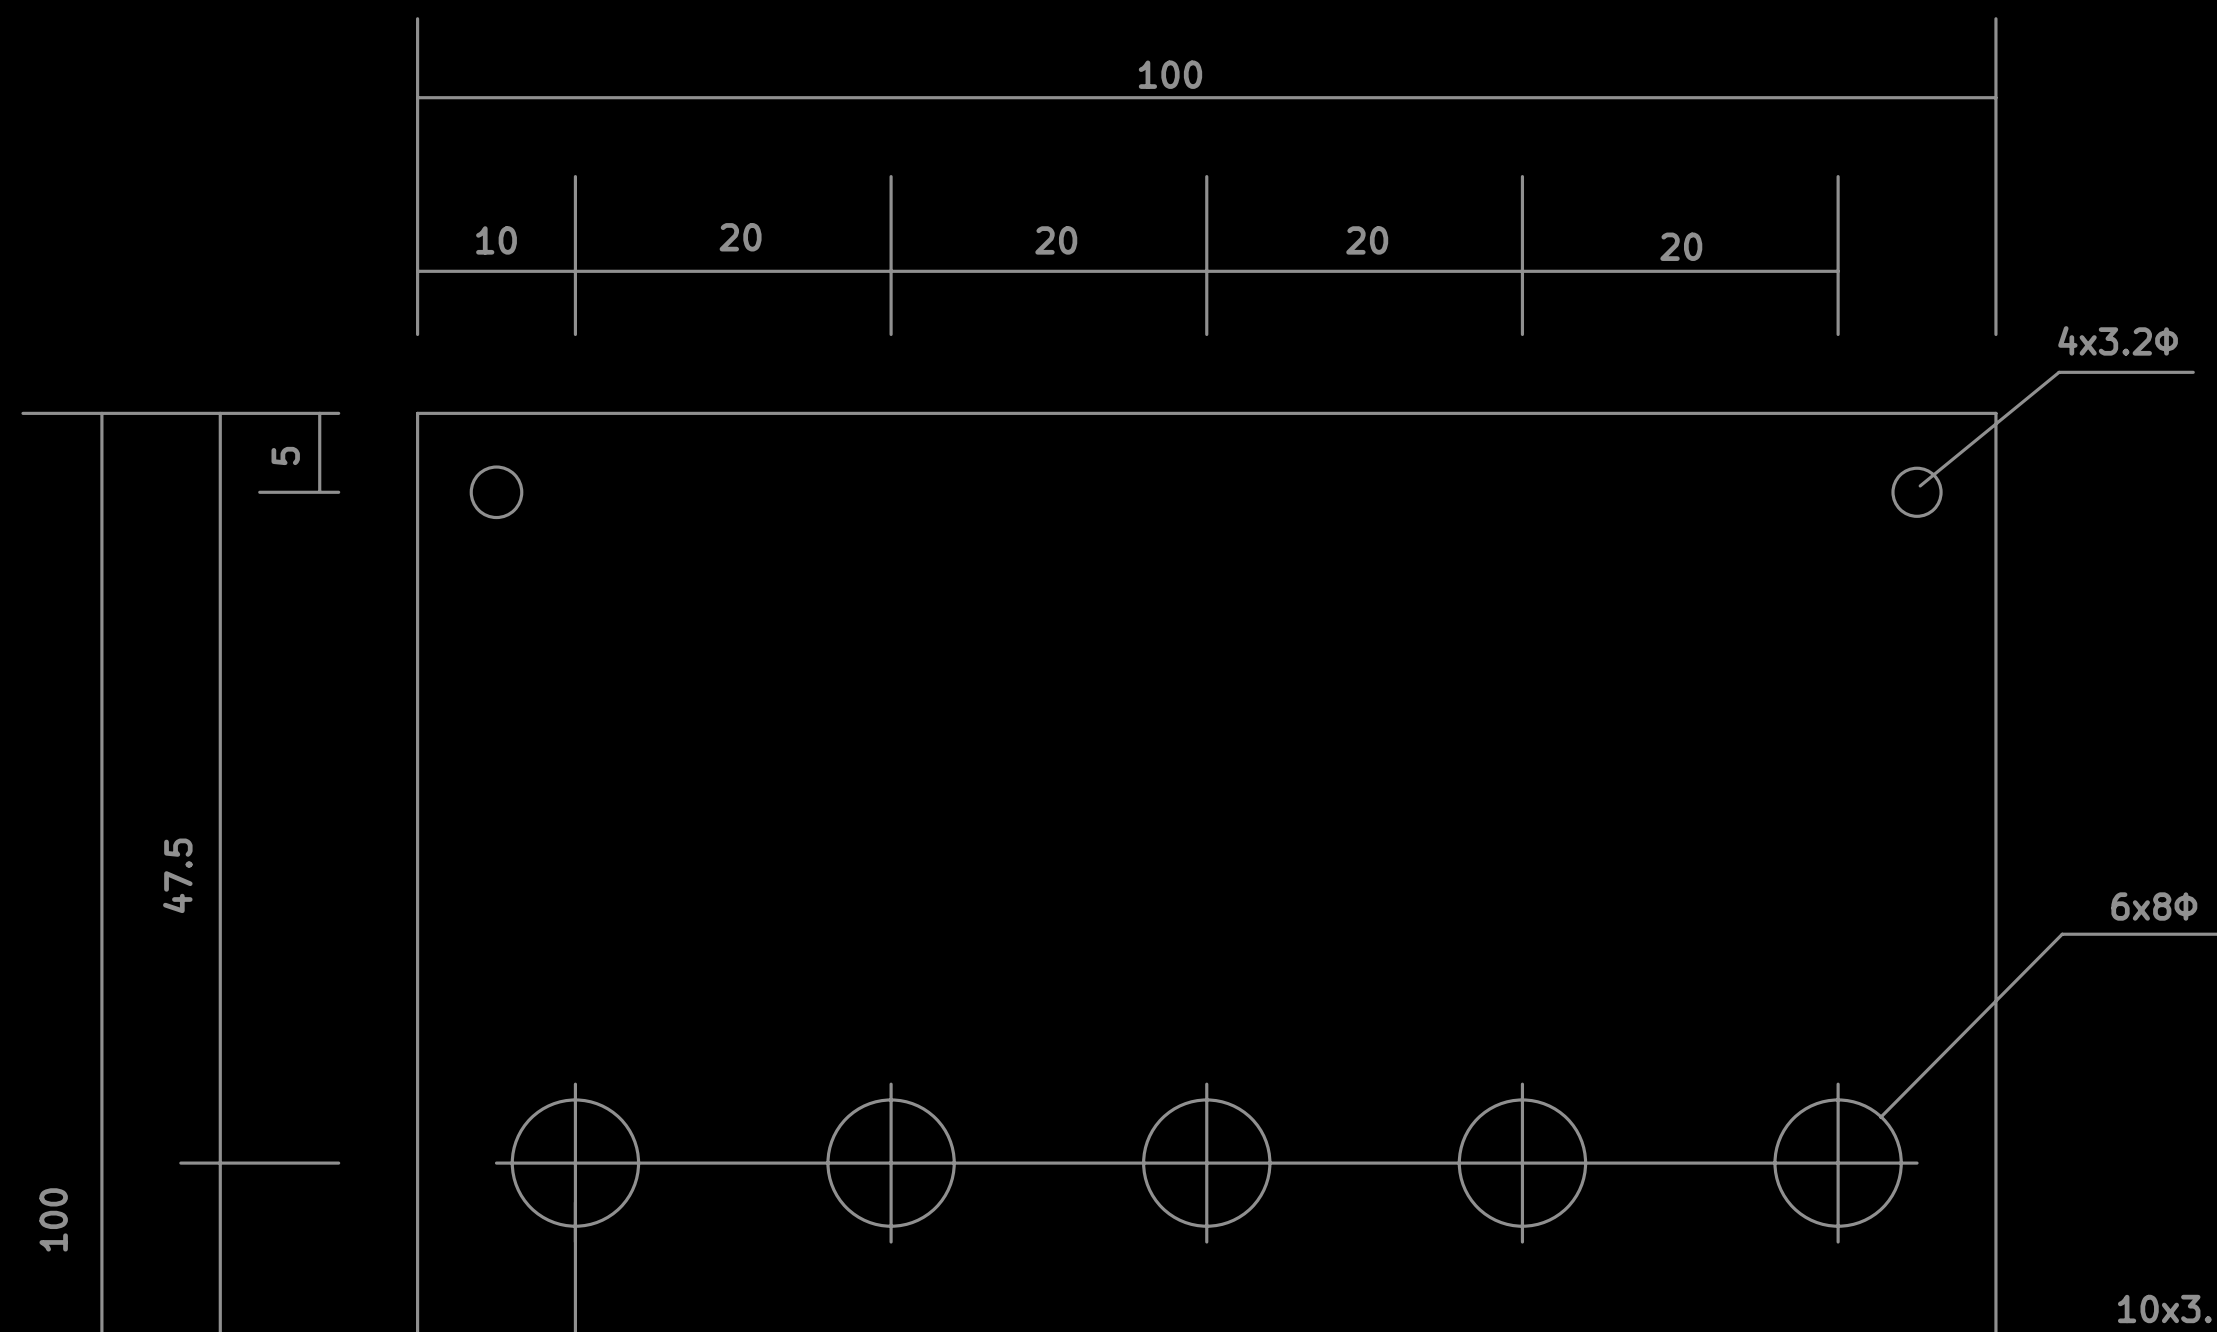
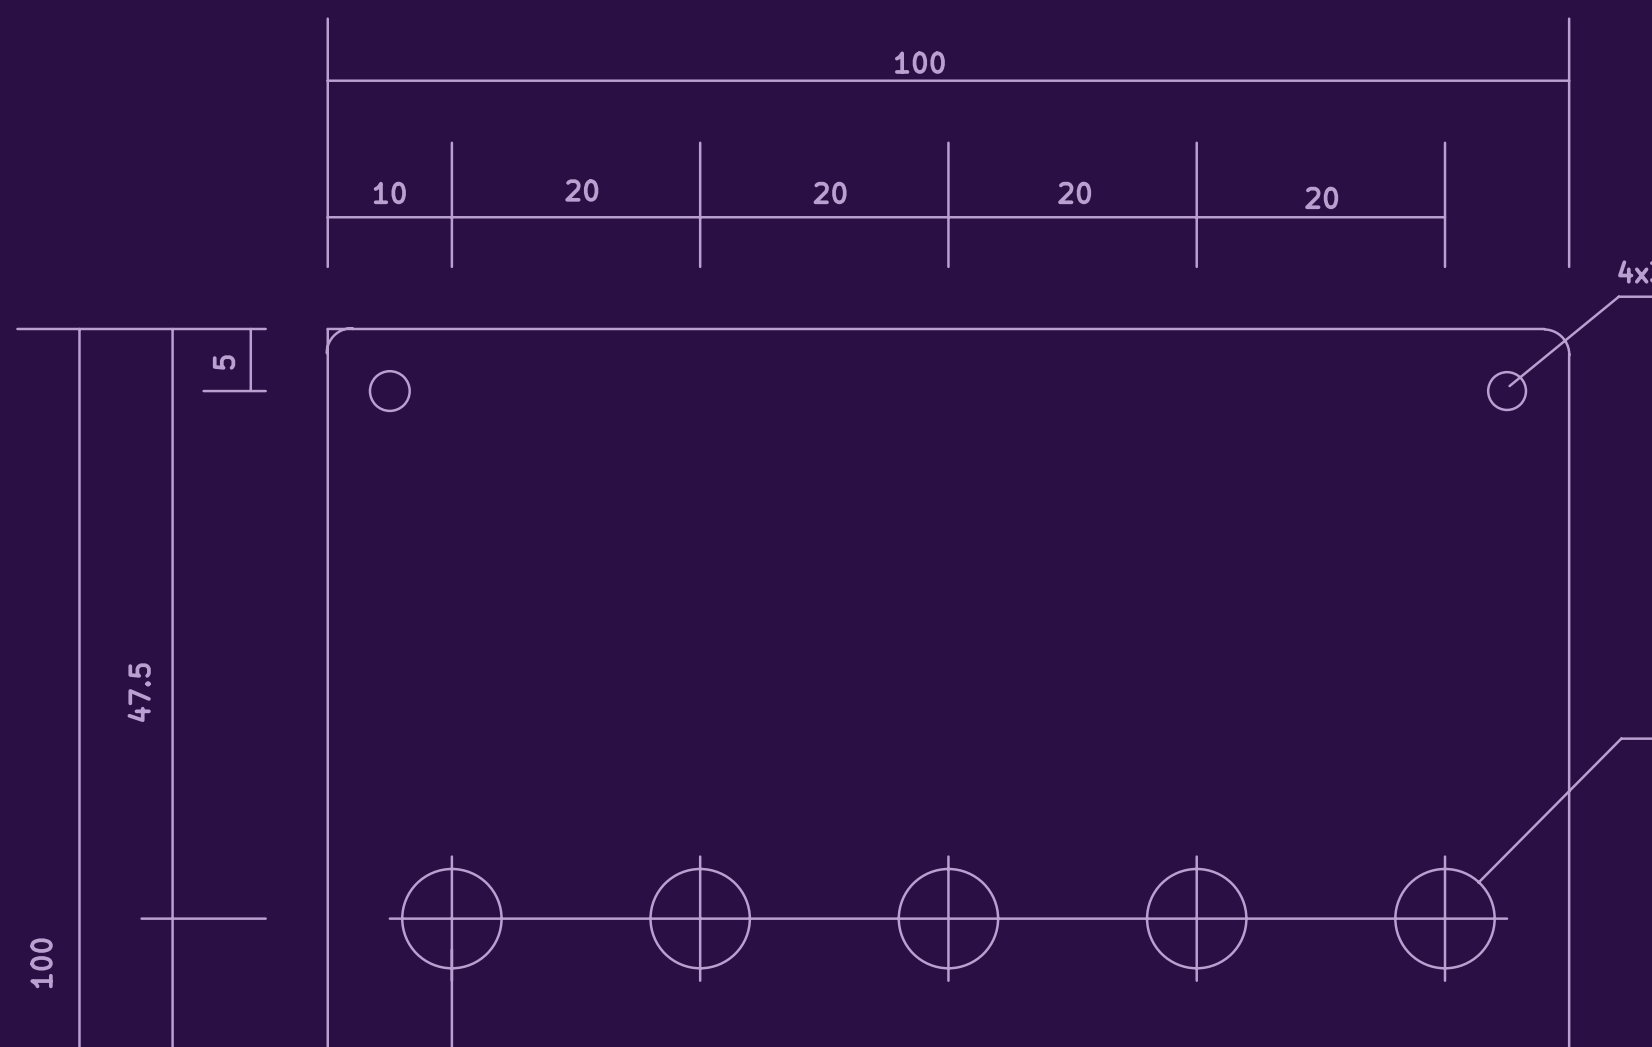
line: none -> (352, 328) (342, 329) (334, 335) (328, 343) (326, 352)
line: (1964, 413) (1995, 413) (1995, 444) -> none
line: none -> (1544, 329) (1554, 331) (1562, 337) (1567, 345) (1569, 355)

